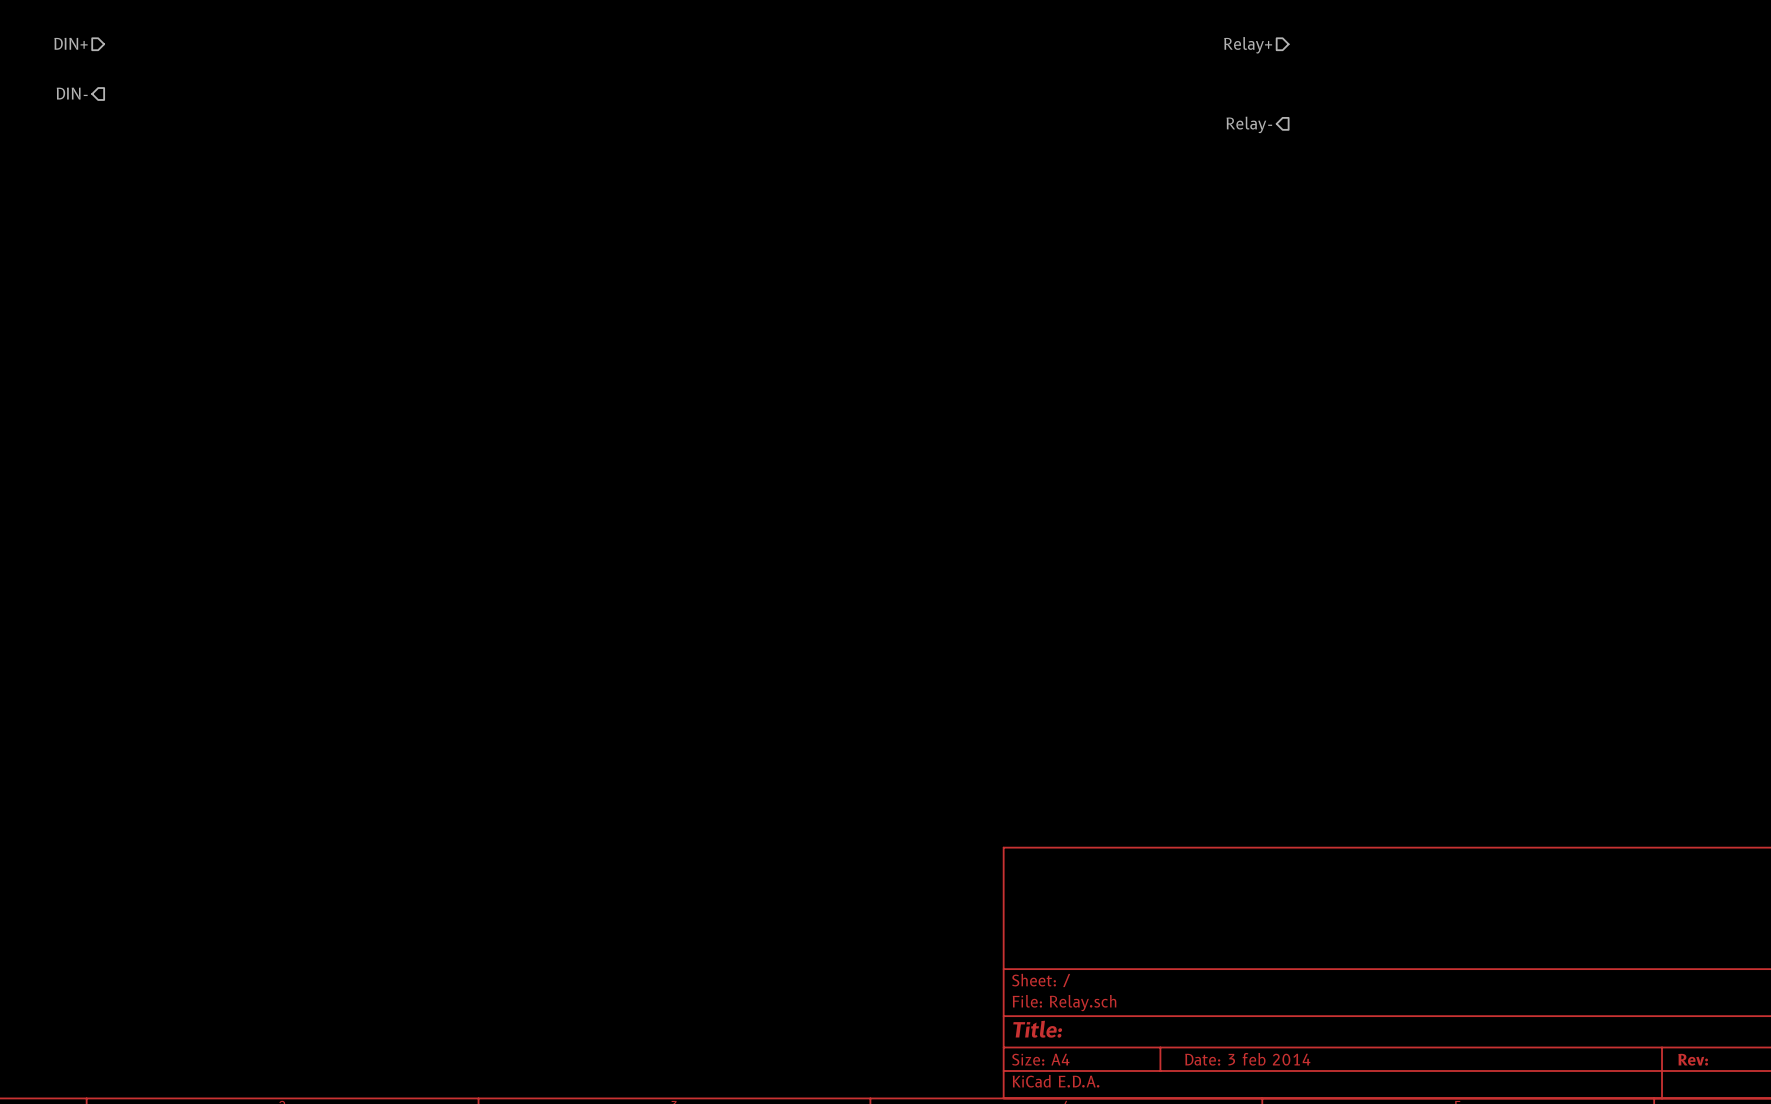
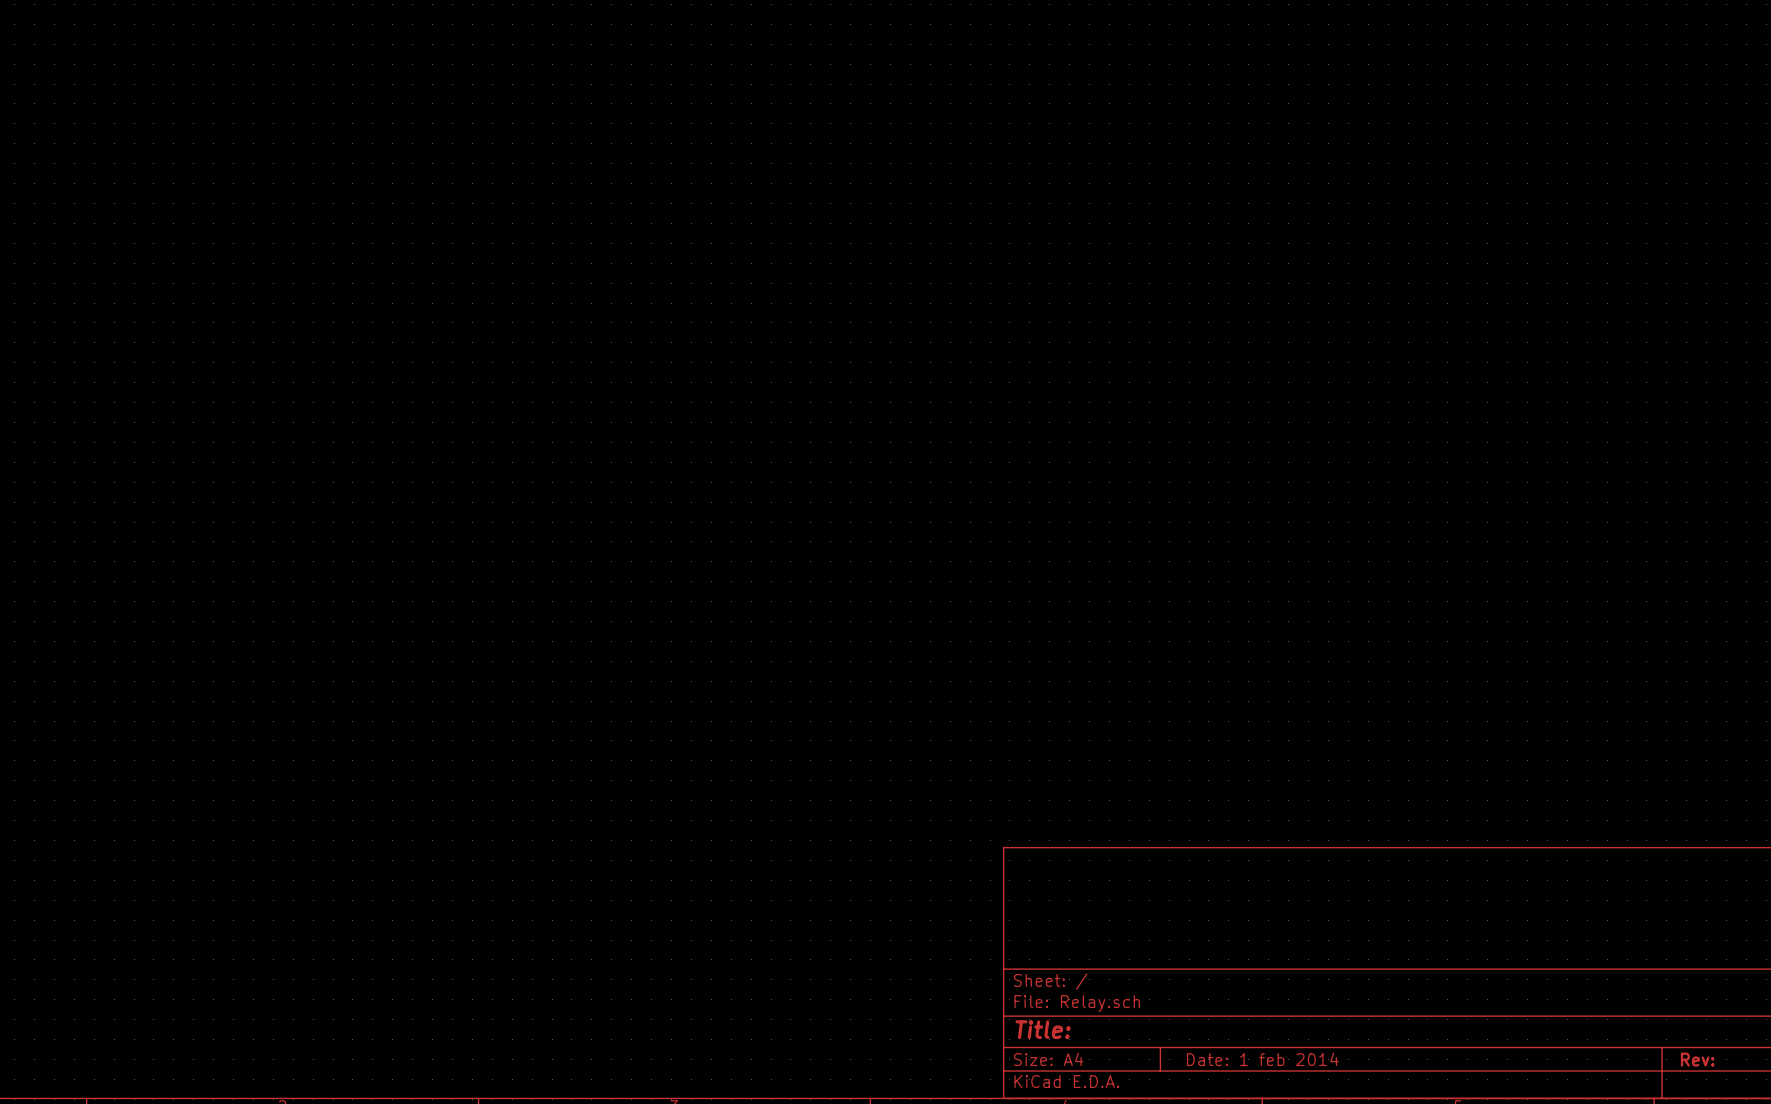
hierarchical label: DIN+ (71, 43) -> none
hierarchical label: Relay+ (1248, 45) -> none
hierarchical label: DIN- (72, 93) -> none
hierarchical label: Relay- (1249, 124) -> none
title block: Date: 3 feb 2014 (1247, 1059) -> Date: 1 feb 2014 (1262, 1059)

